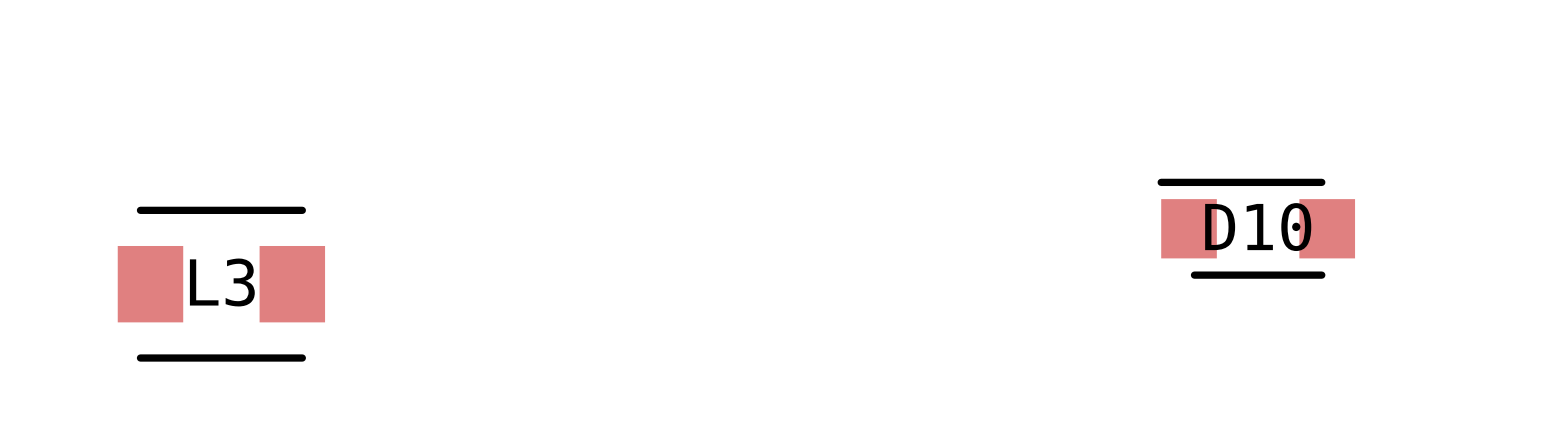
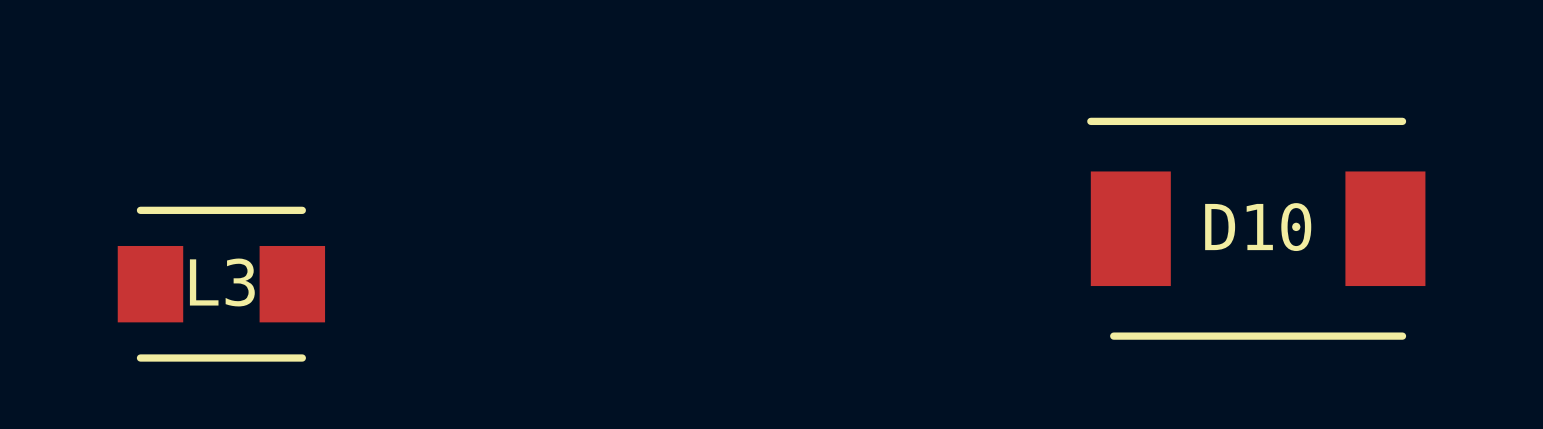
D10 footprint: [1157, 178, 1356, 279] -> [1087, 117, 1426, 340]

